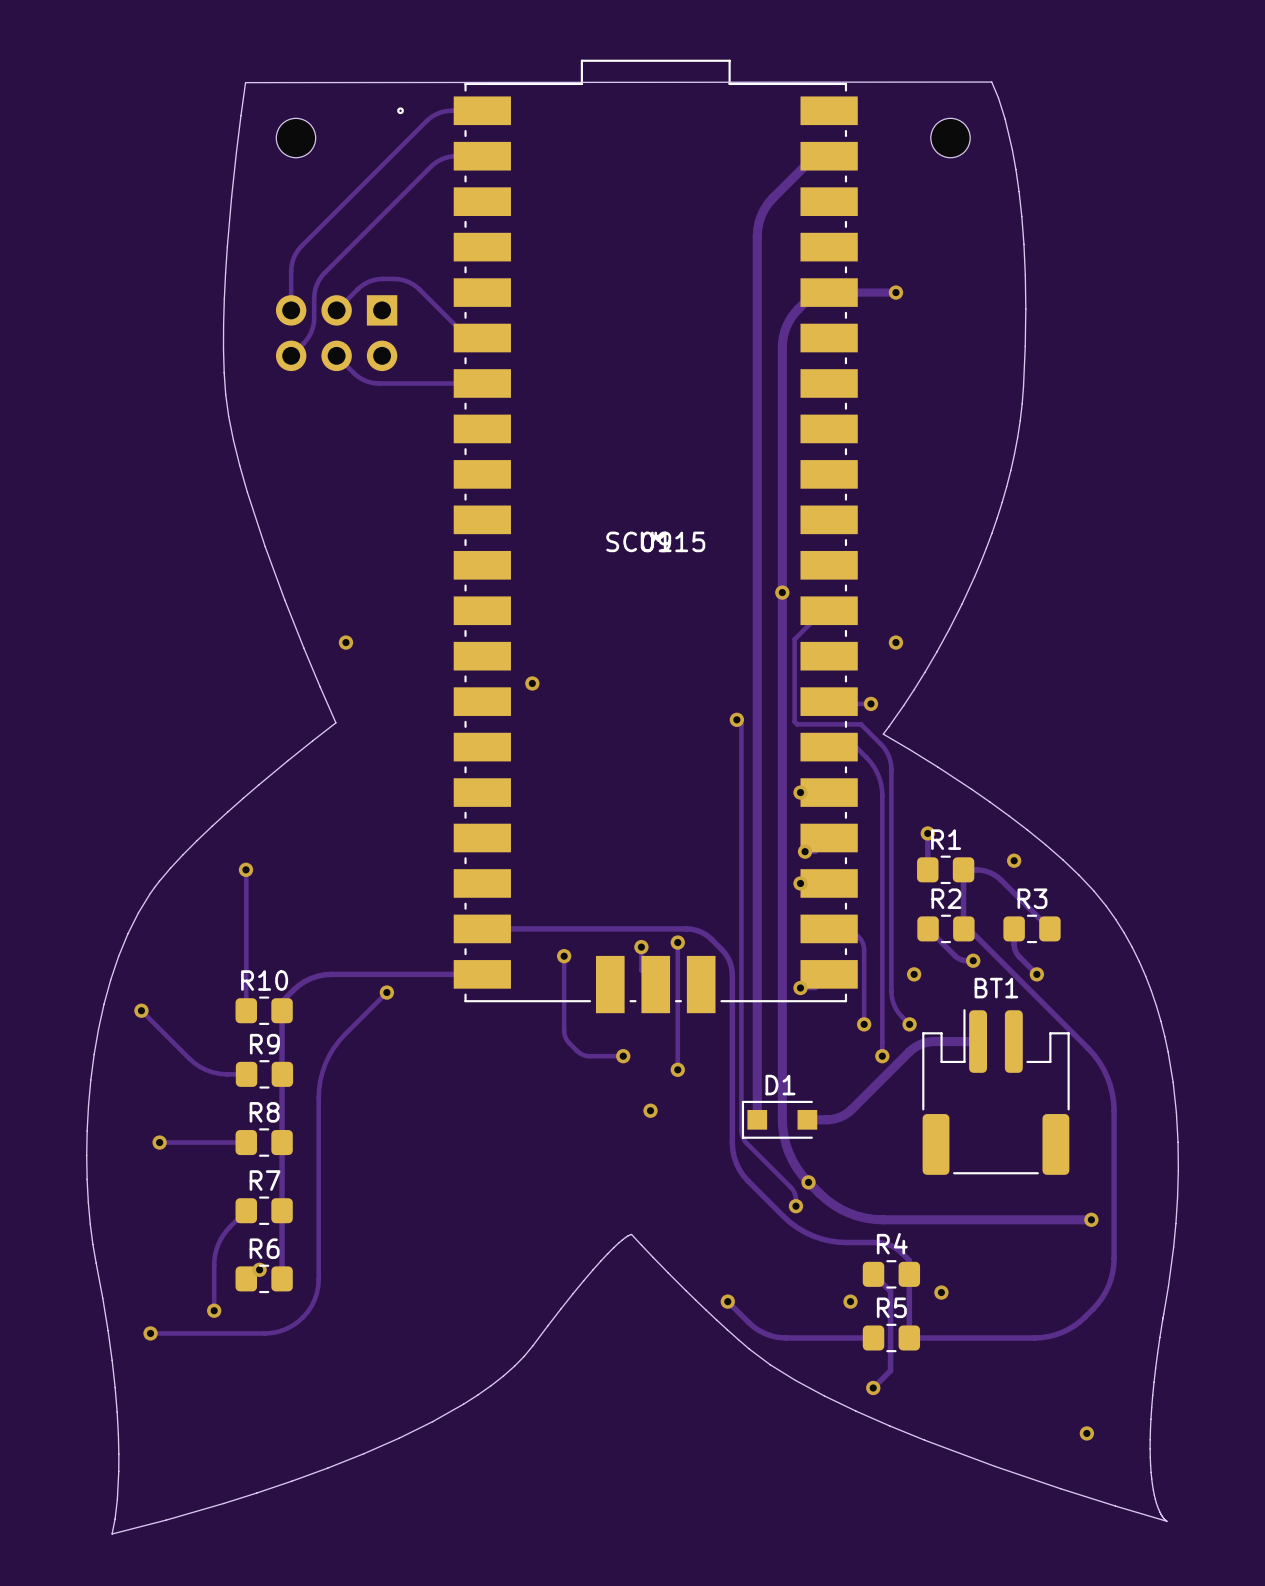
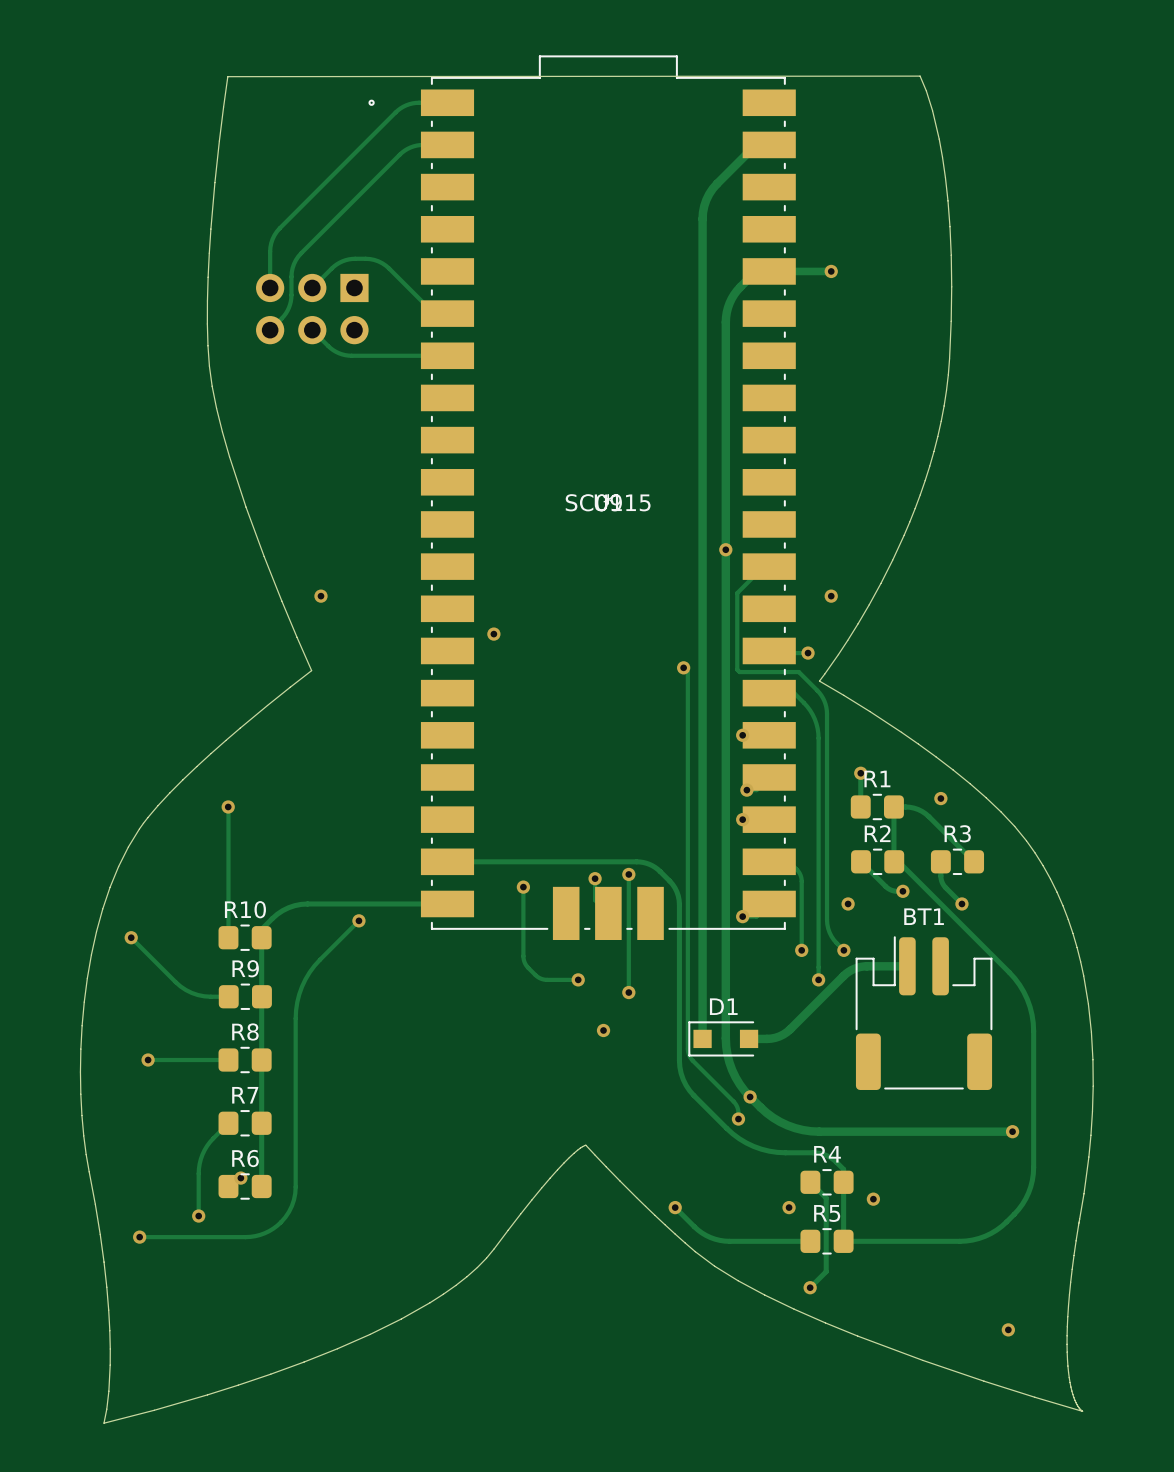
part: (295, 138) -> none
part: (950, 138) -> none

